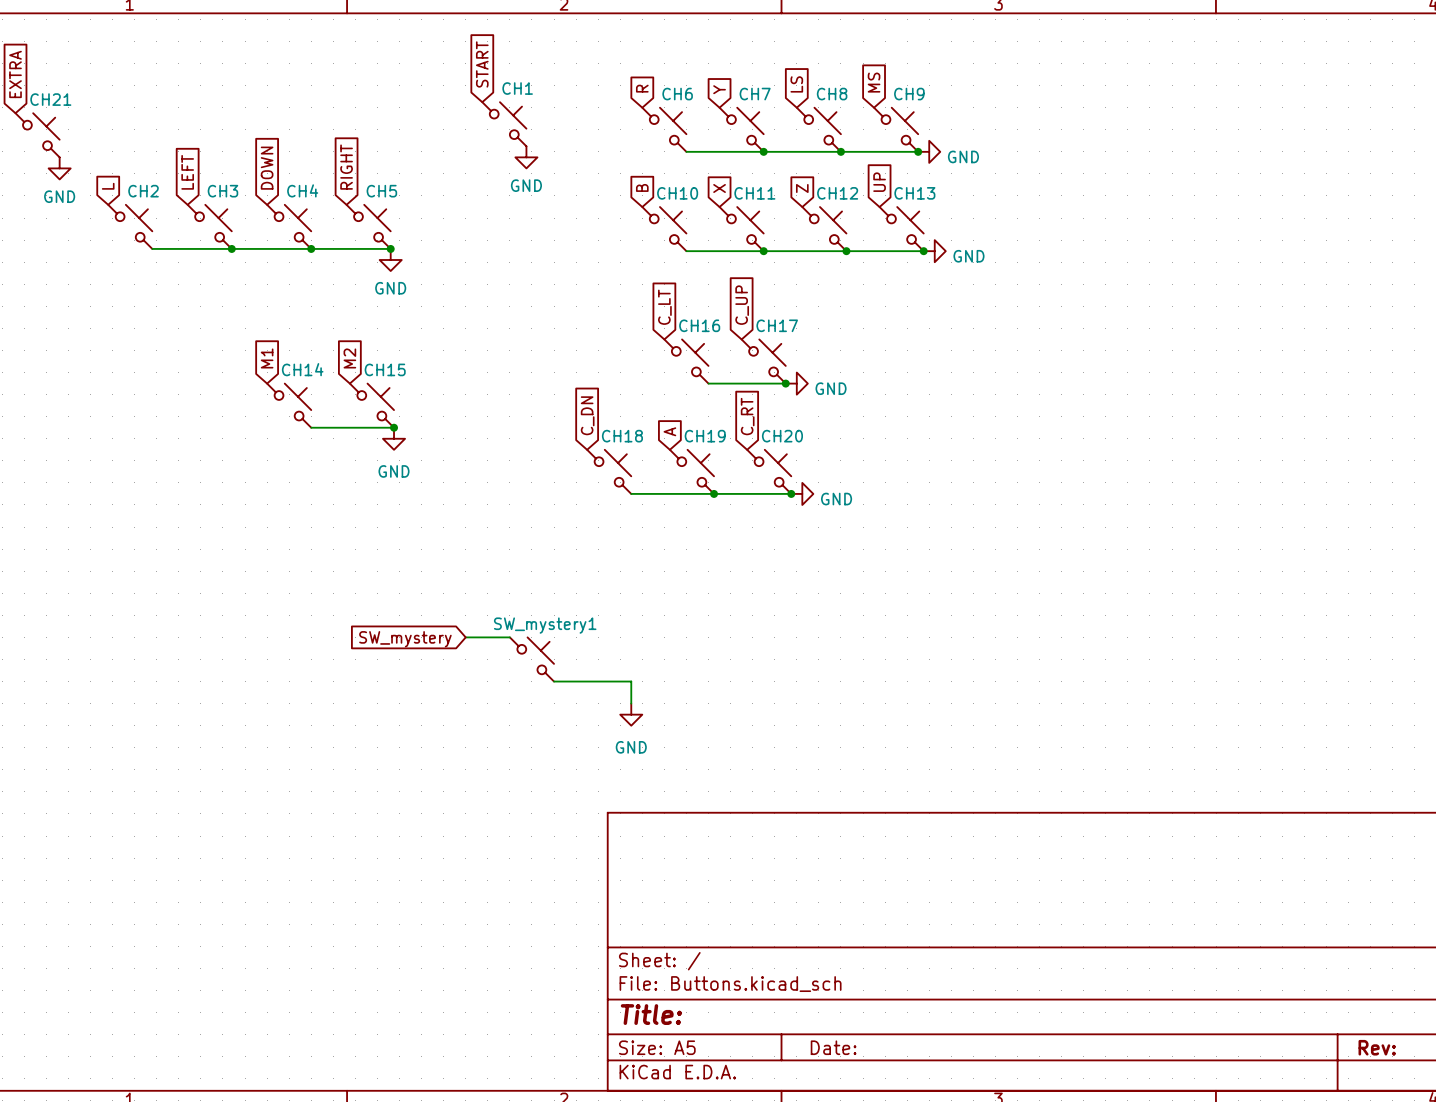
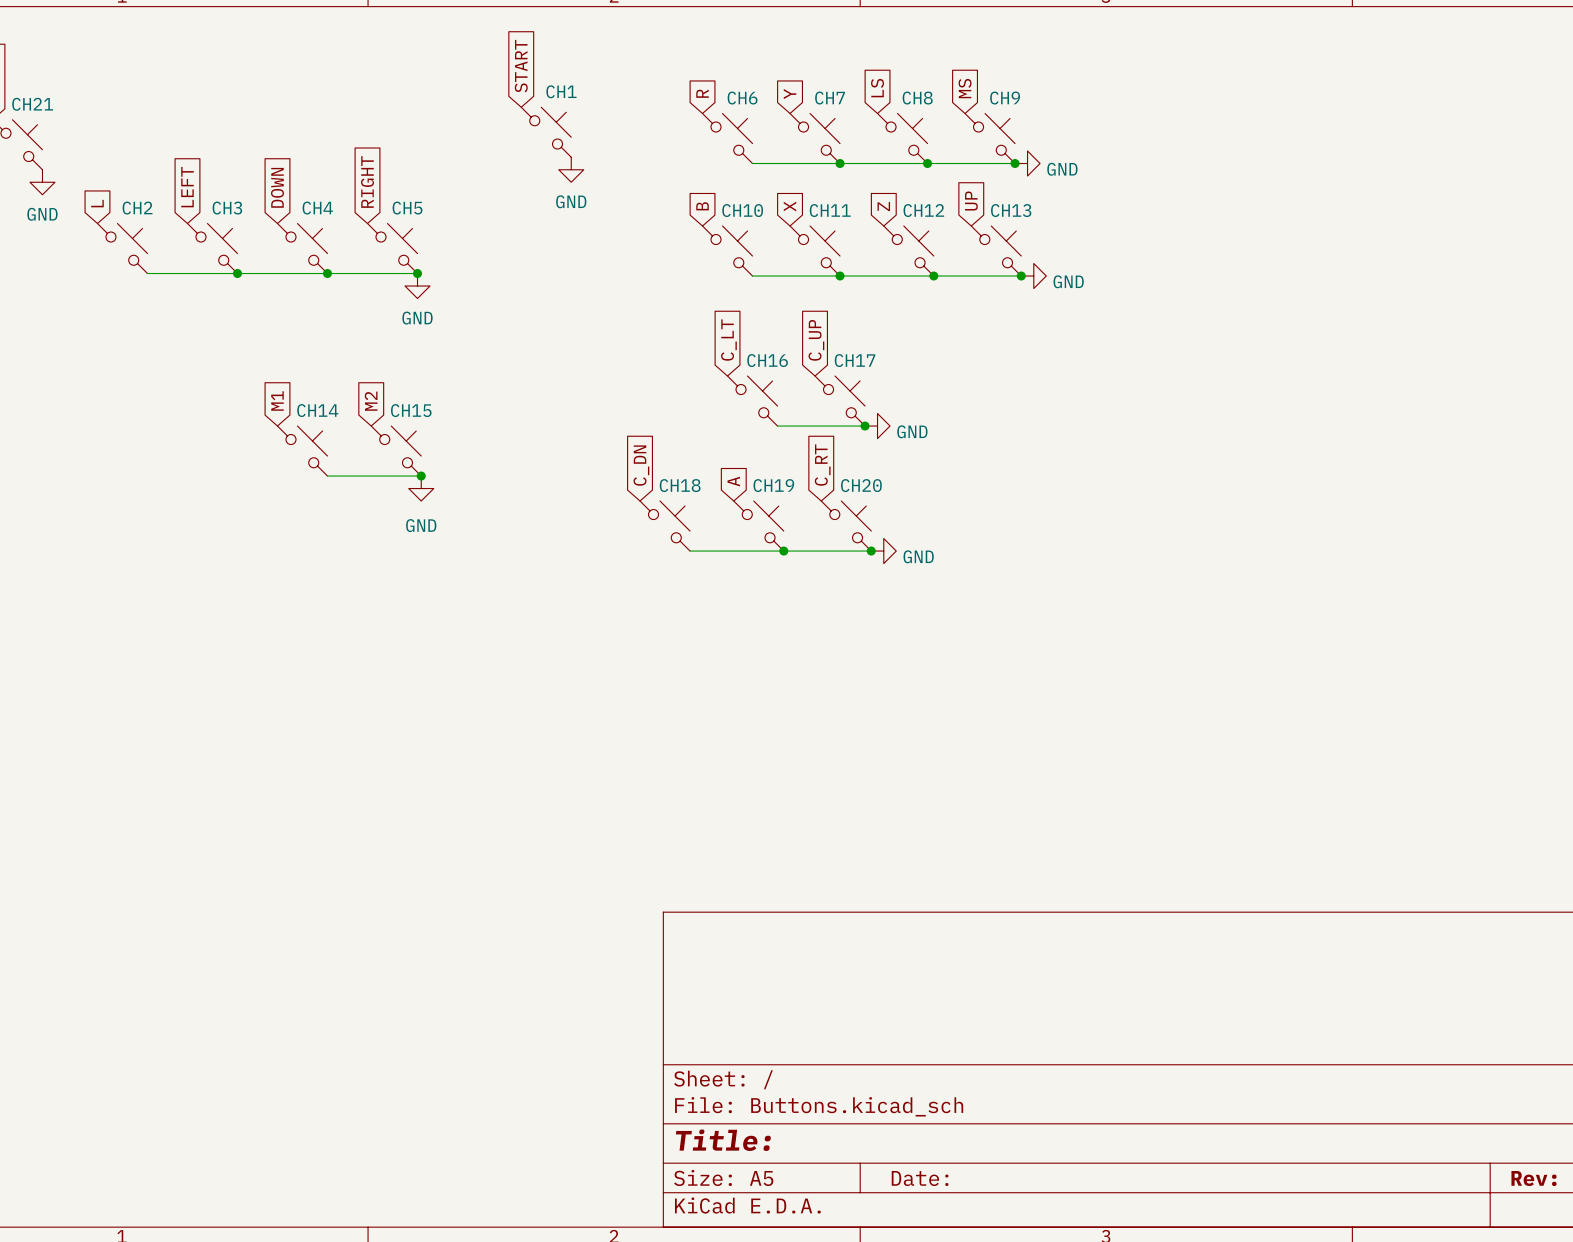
wire: (465, 637) (509, 637) -> none
global label: SW_mystery (405, 639) -> none
SW_mystery1: (531, 659) -> none
wire: (554, 681) (631, 681) (631, 703) -> none
power symbol: GND (631, 714) -> none

